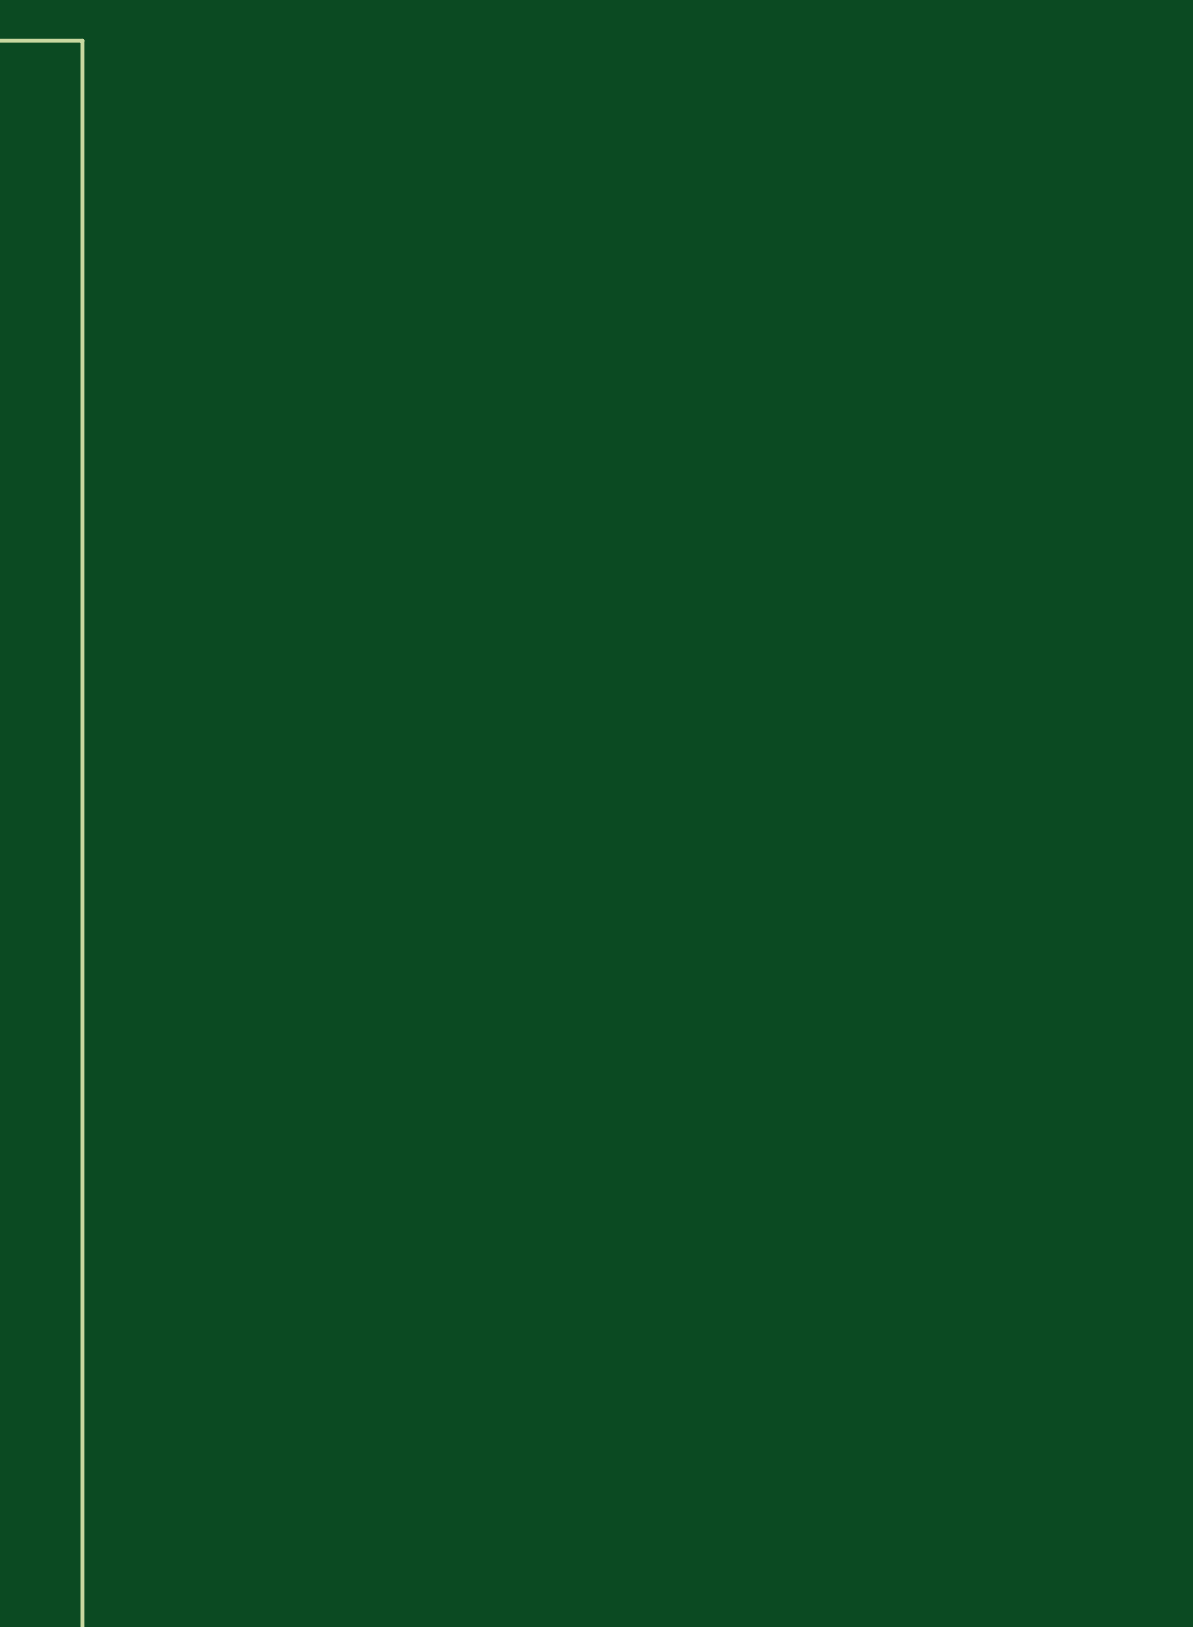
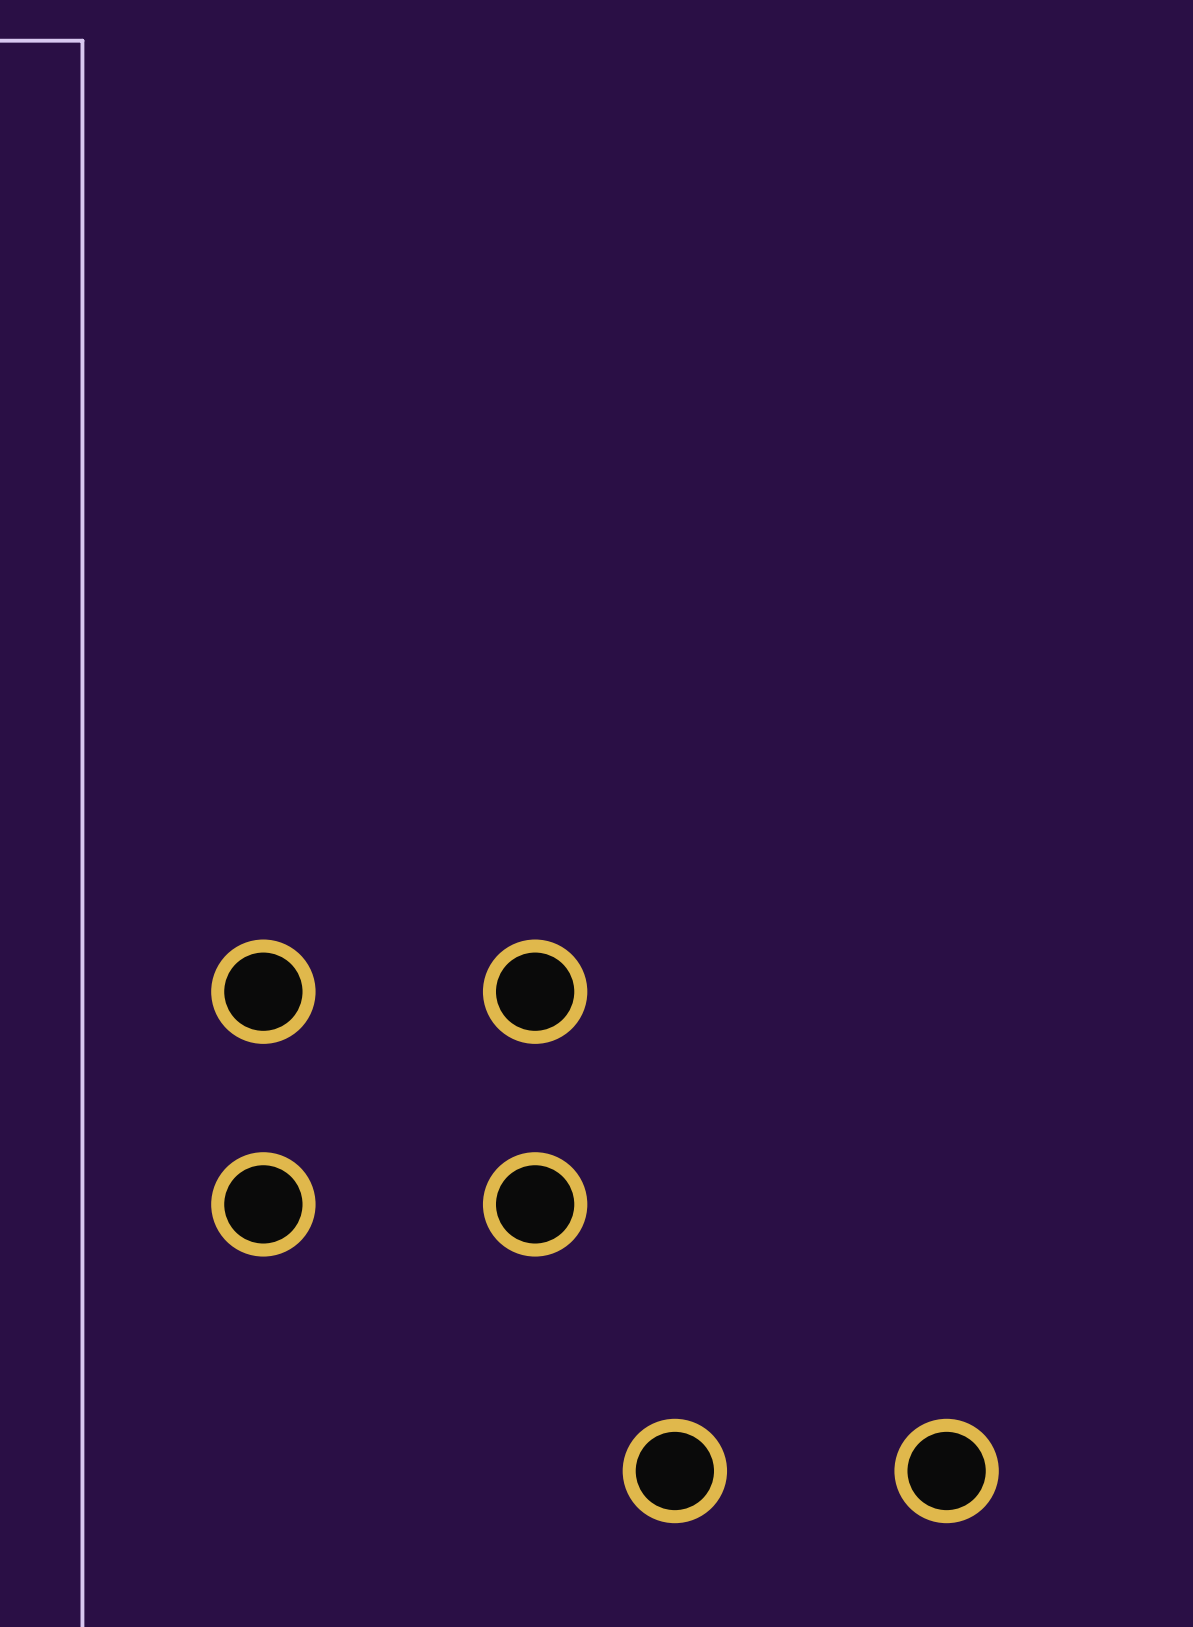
part: none -> (263, 991)
part: none -> (535, 991)
part: none -> (263, 1204)
part: none -> (535, 1204)
part: none -> (674, 1470)
part: none -> (946, 1470)

